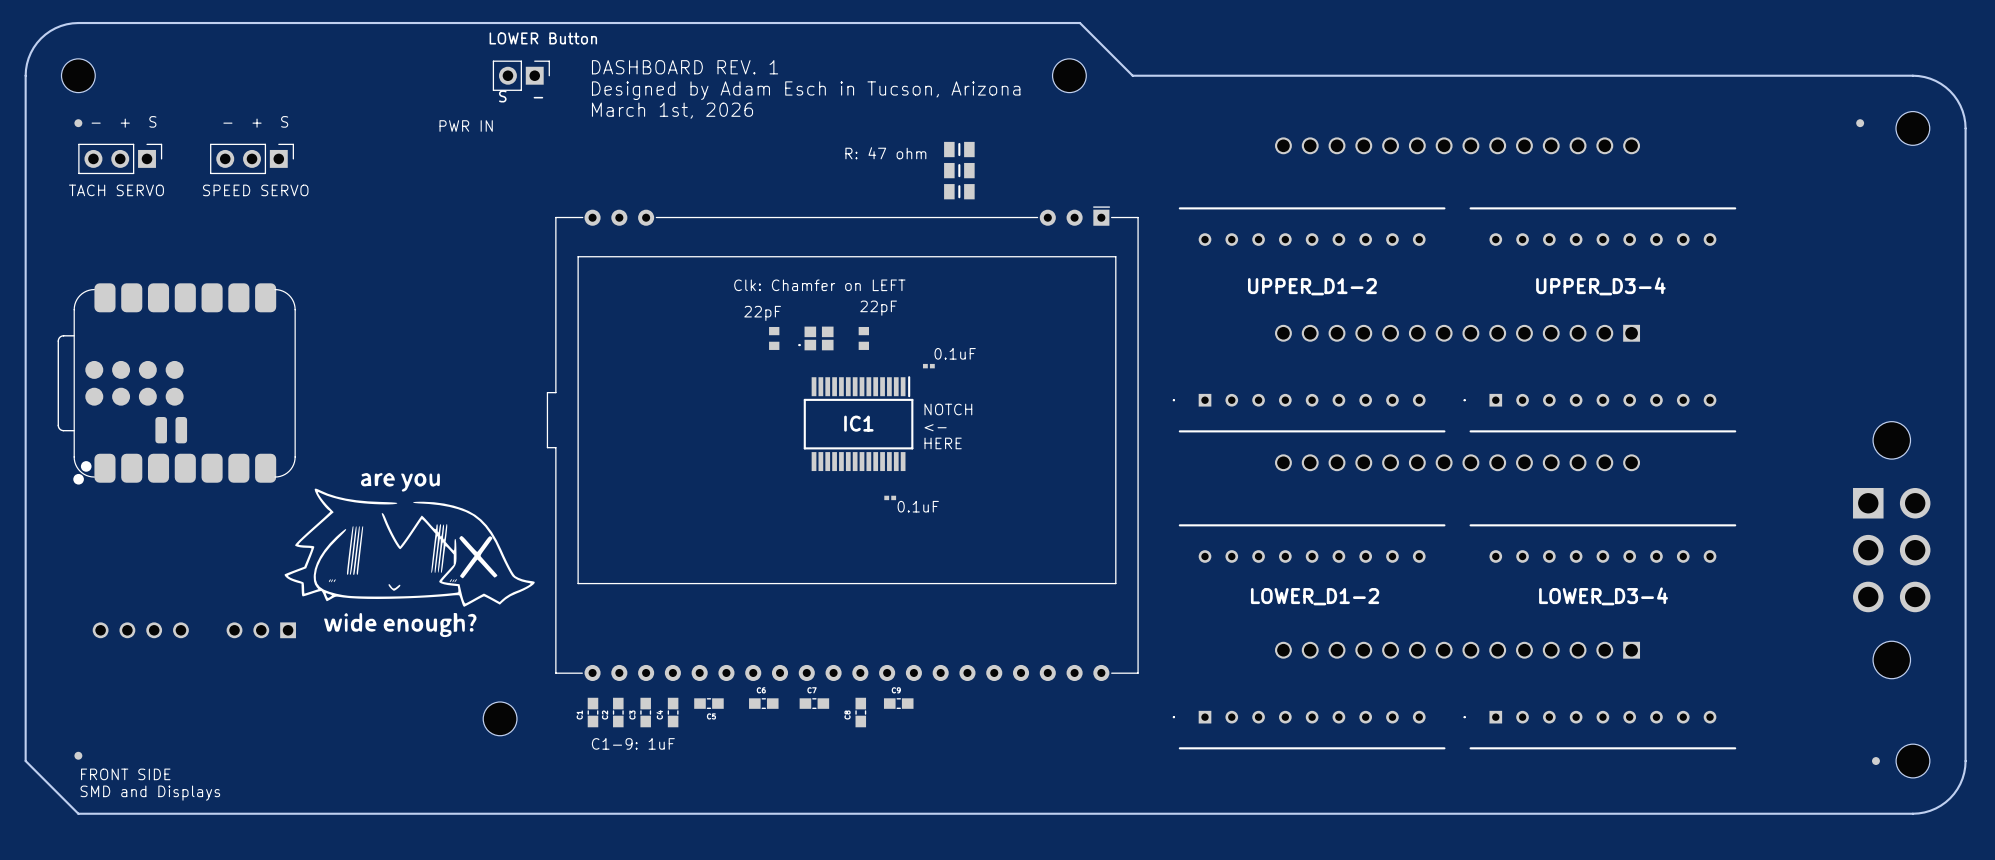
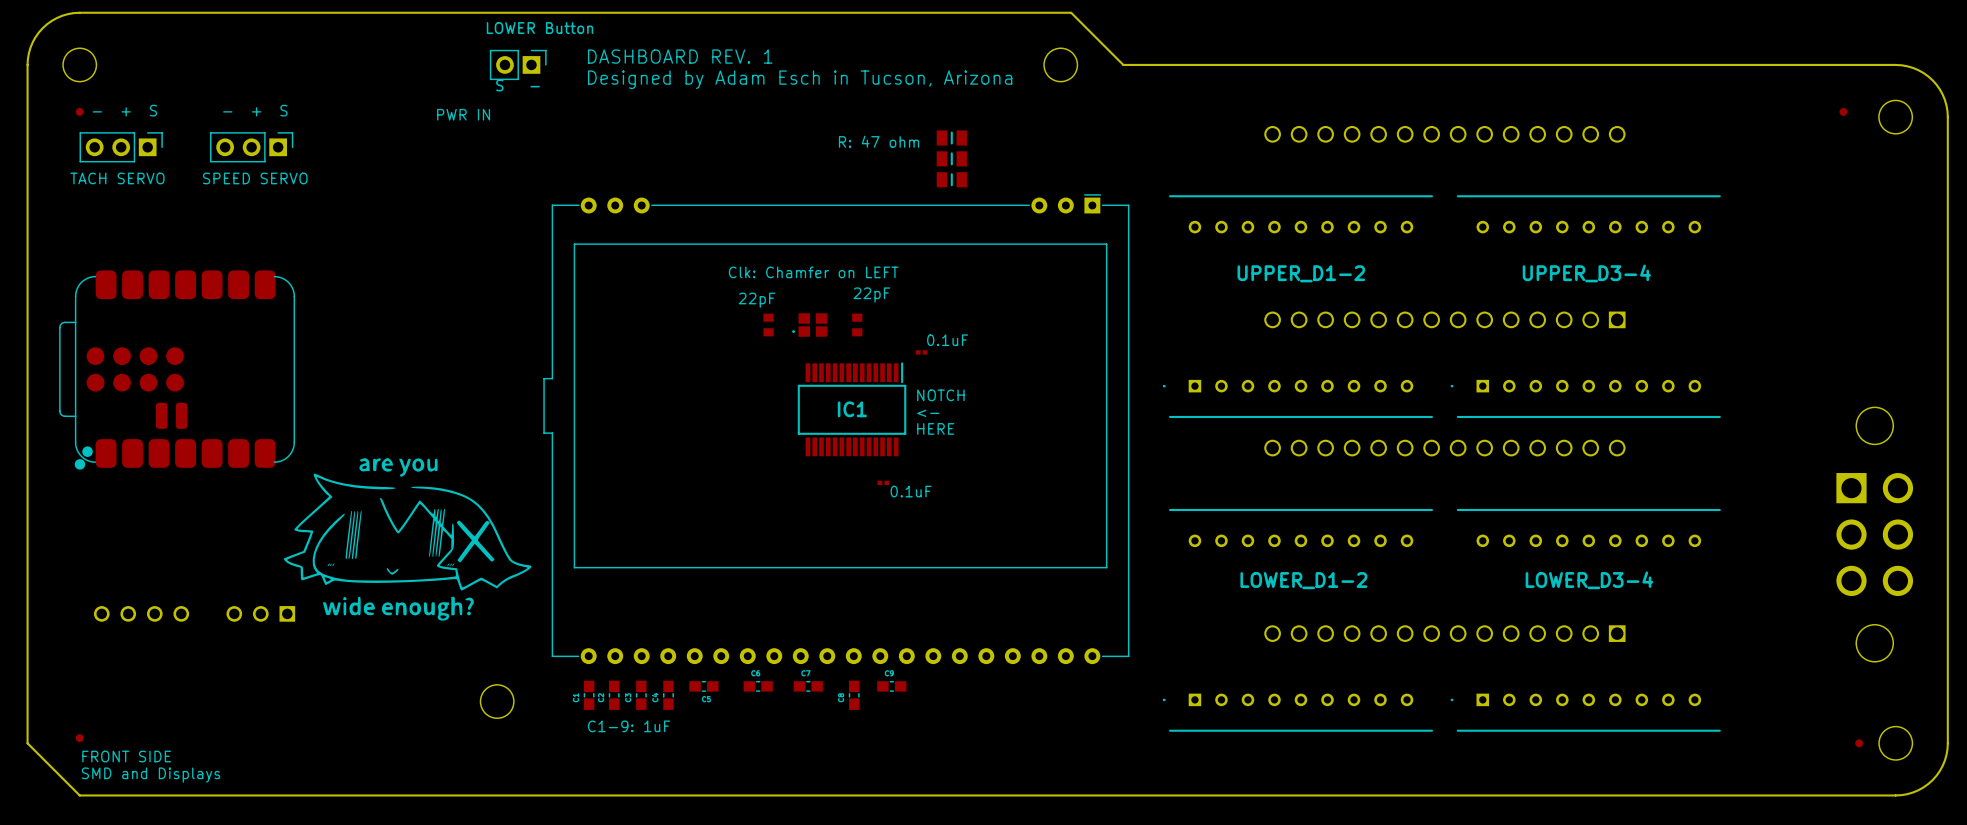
text: March 1st, 2026 (672, 110) -> none

